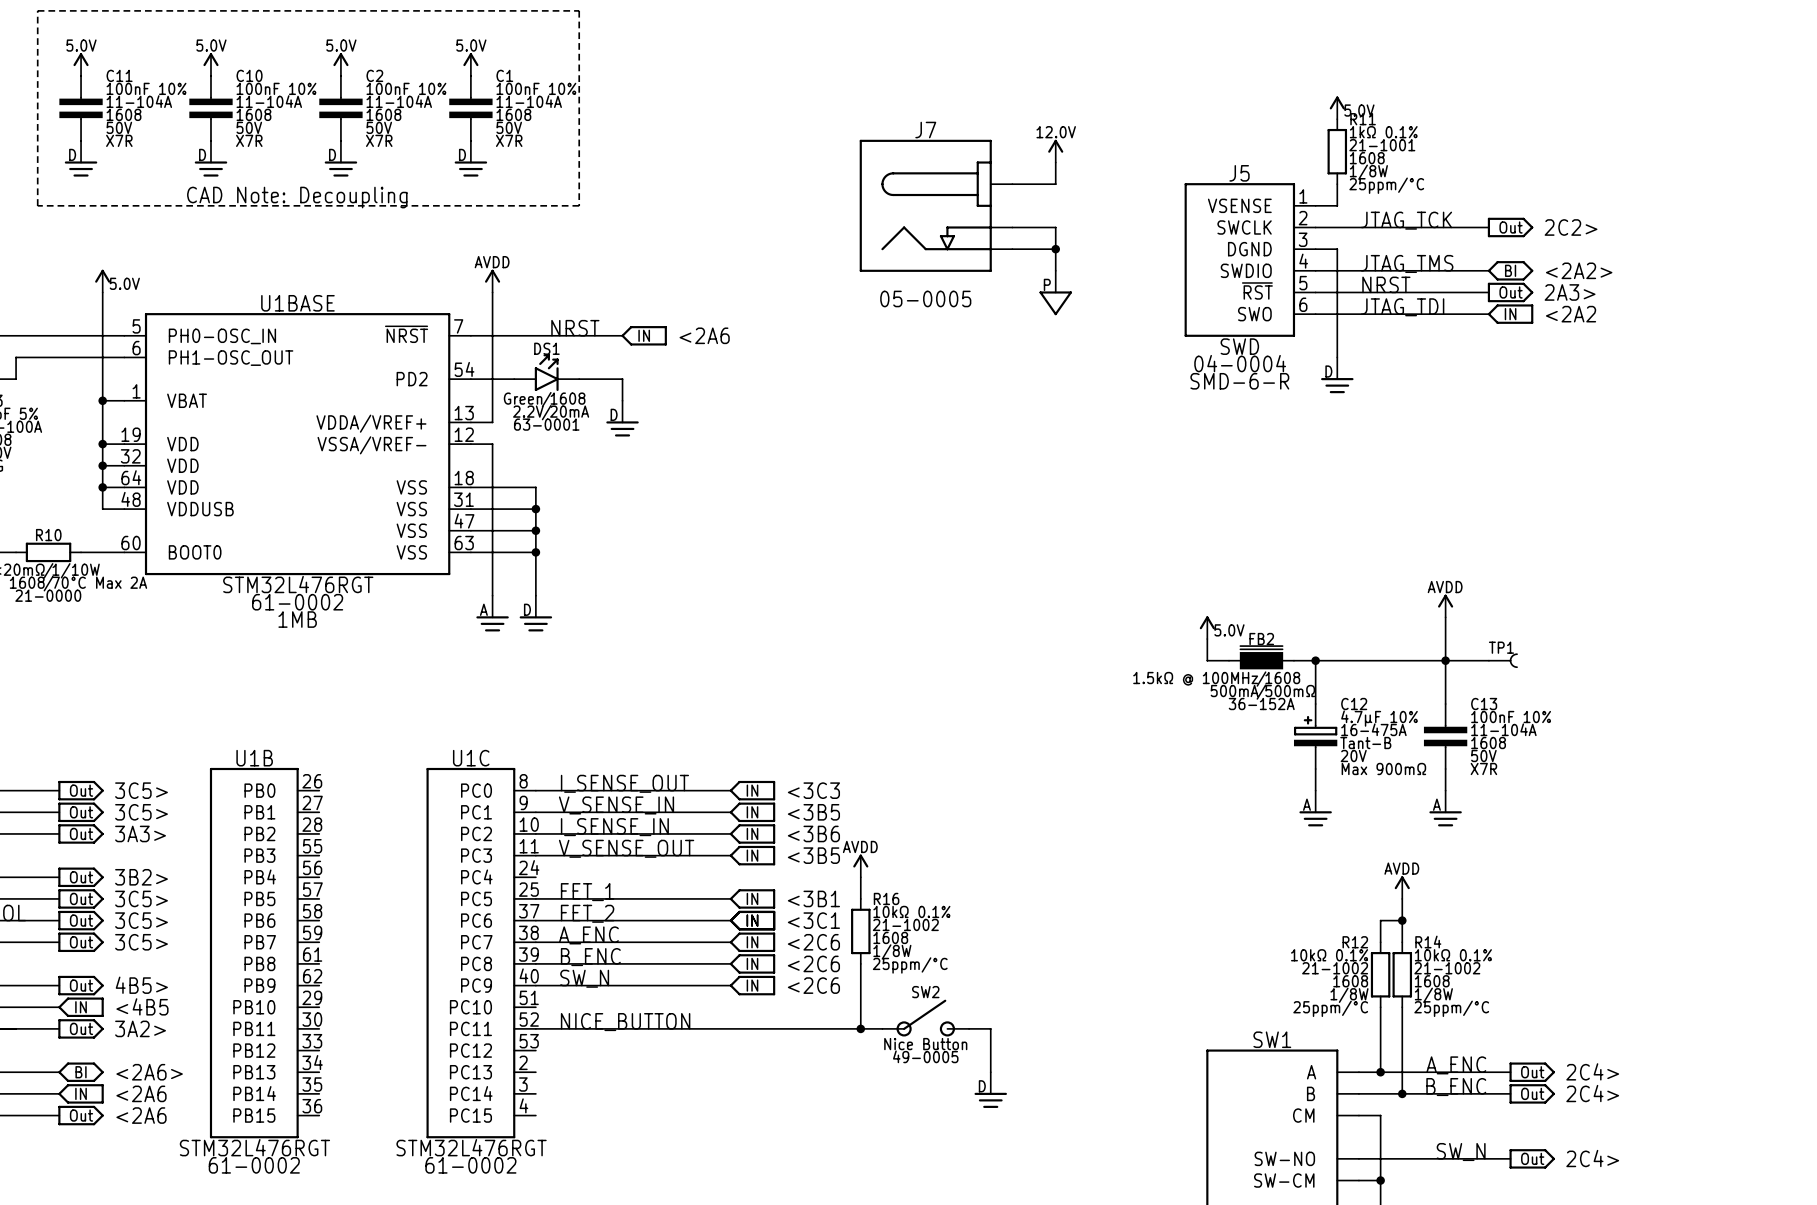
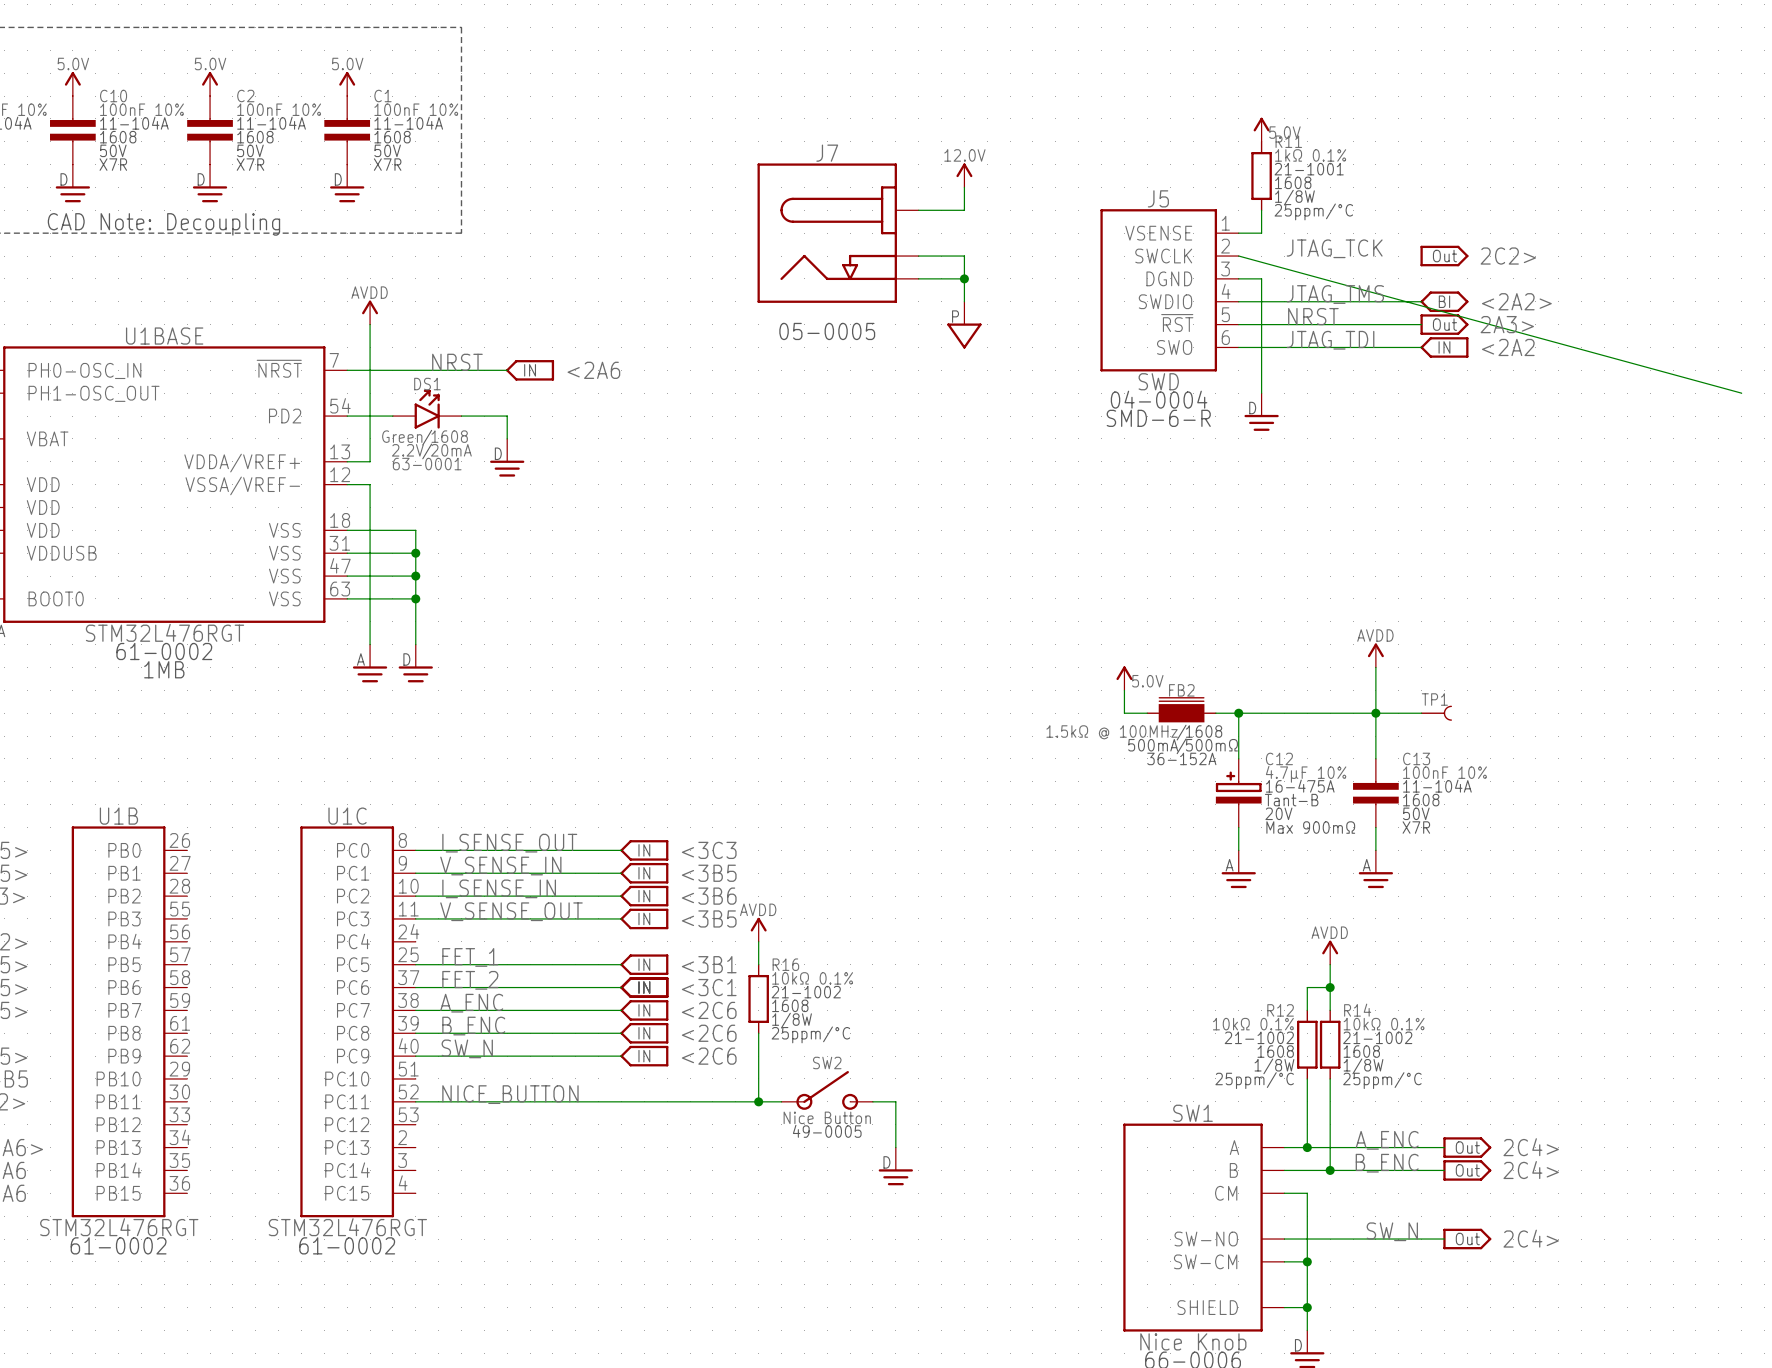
wire: (1315, 227) (1488, 227) -> (1238, 256) (1741, 393)

